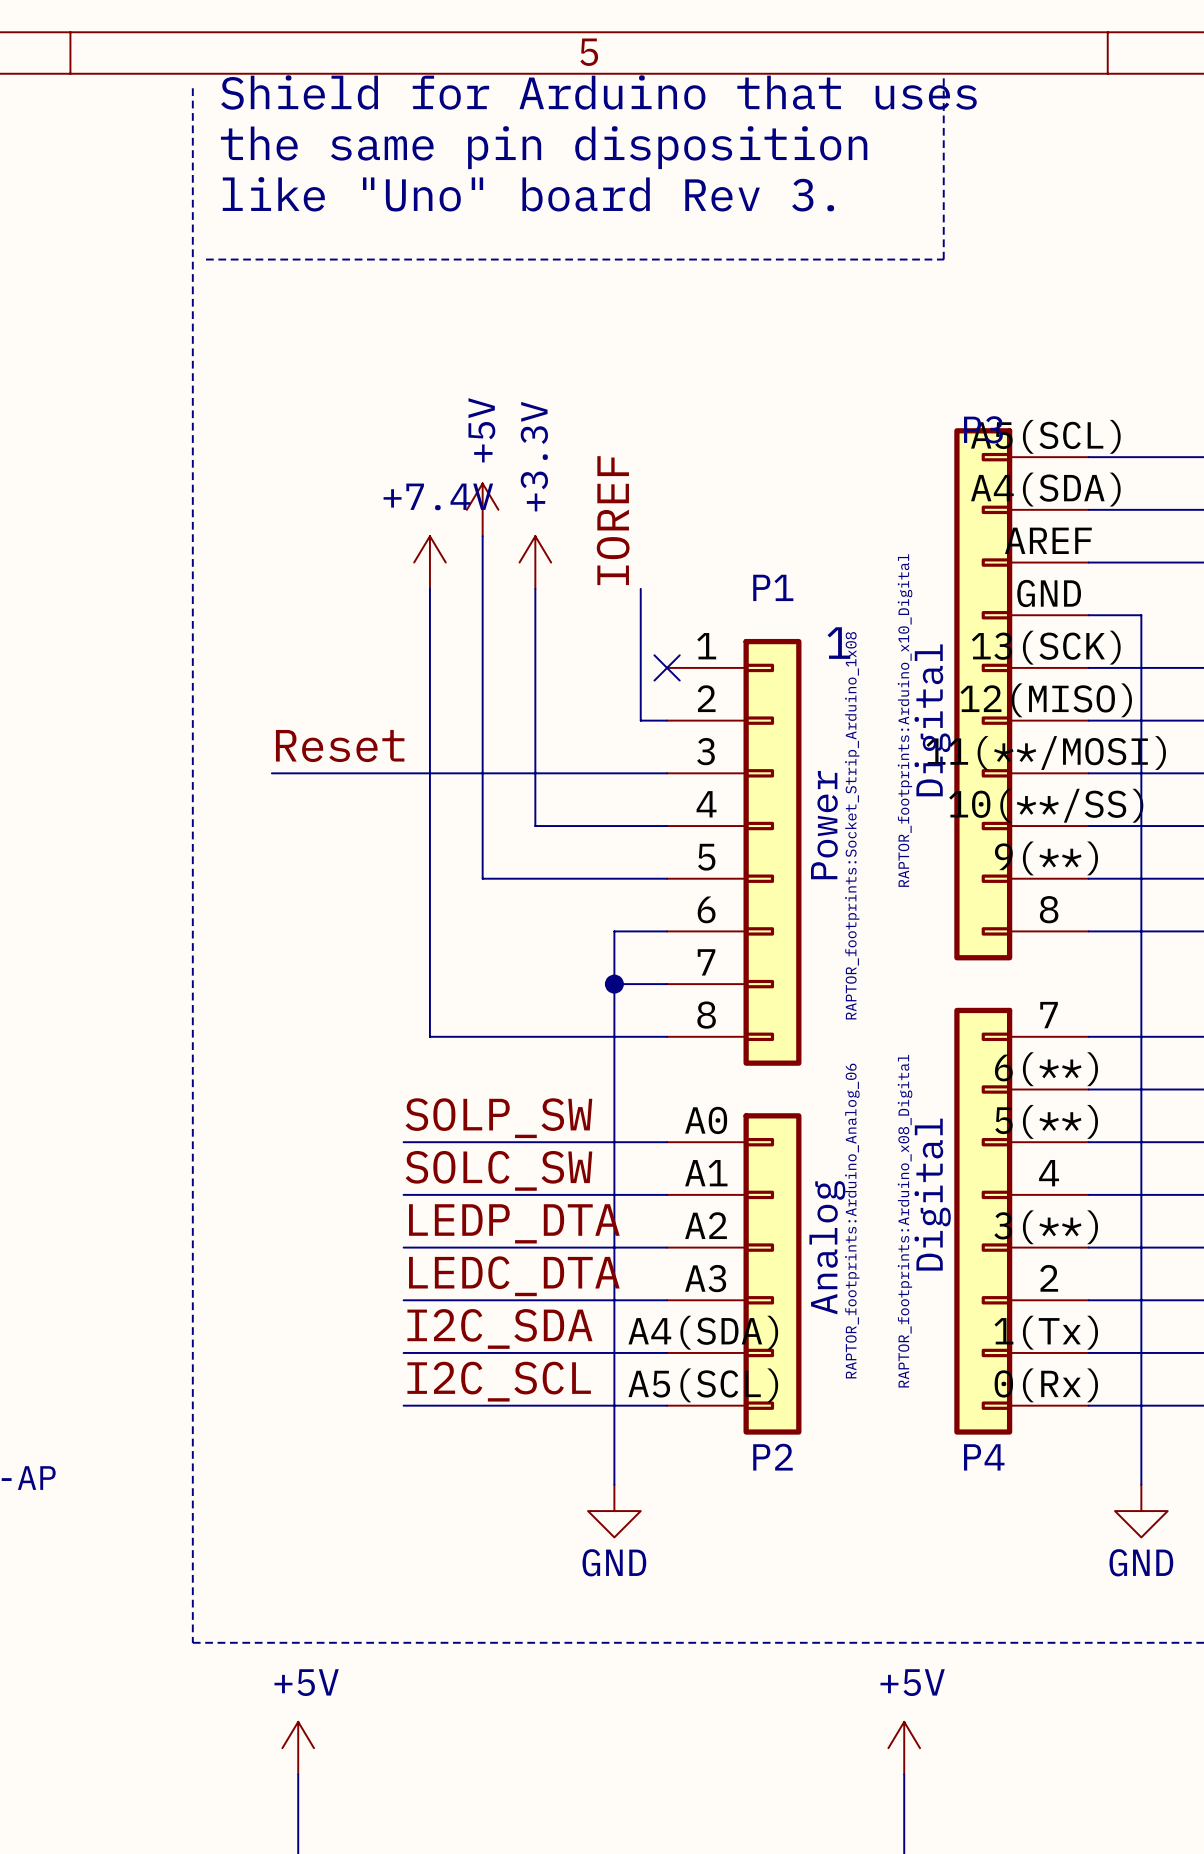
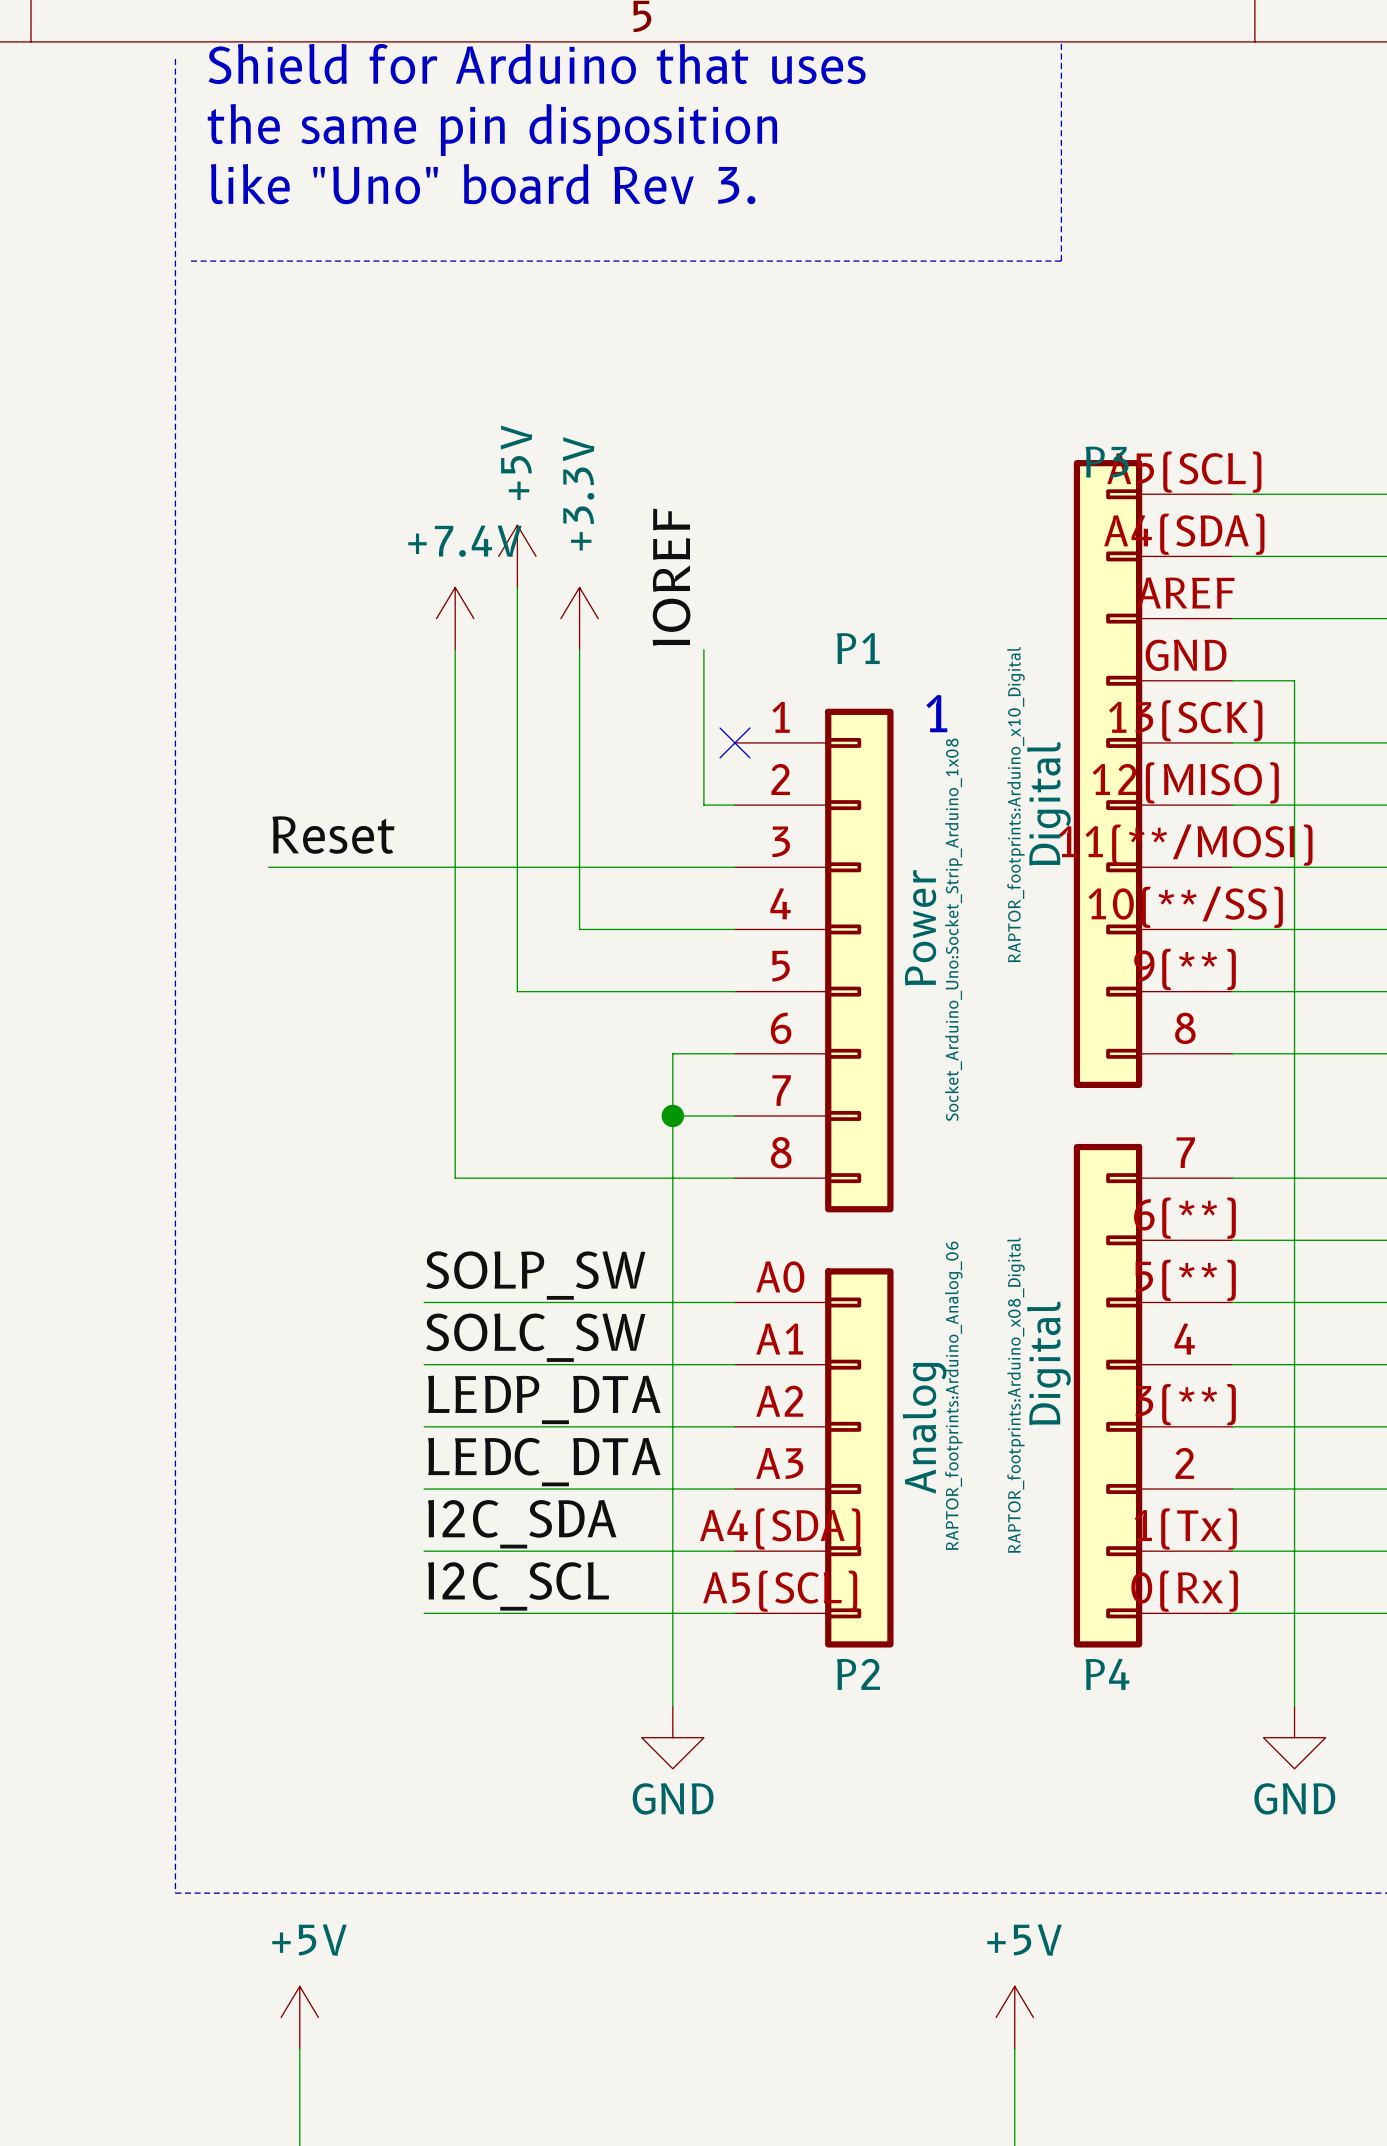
P1 text: RAPTOR_footprints:Socket_Strip_Arduino_1x08 (852, 825) -> Socket_Arduino_Uno:Socket_Strip_Arduino_1x08 (953, 929)

